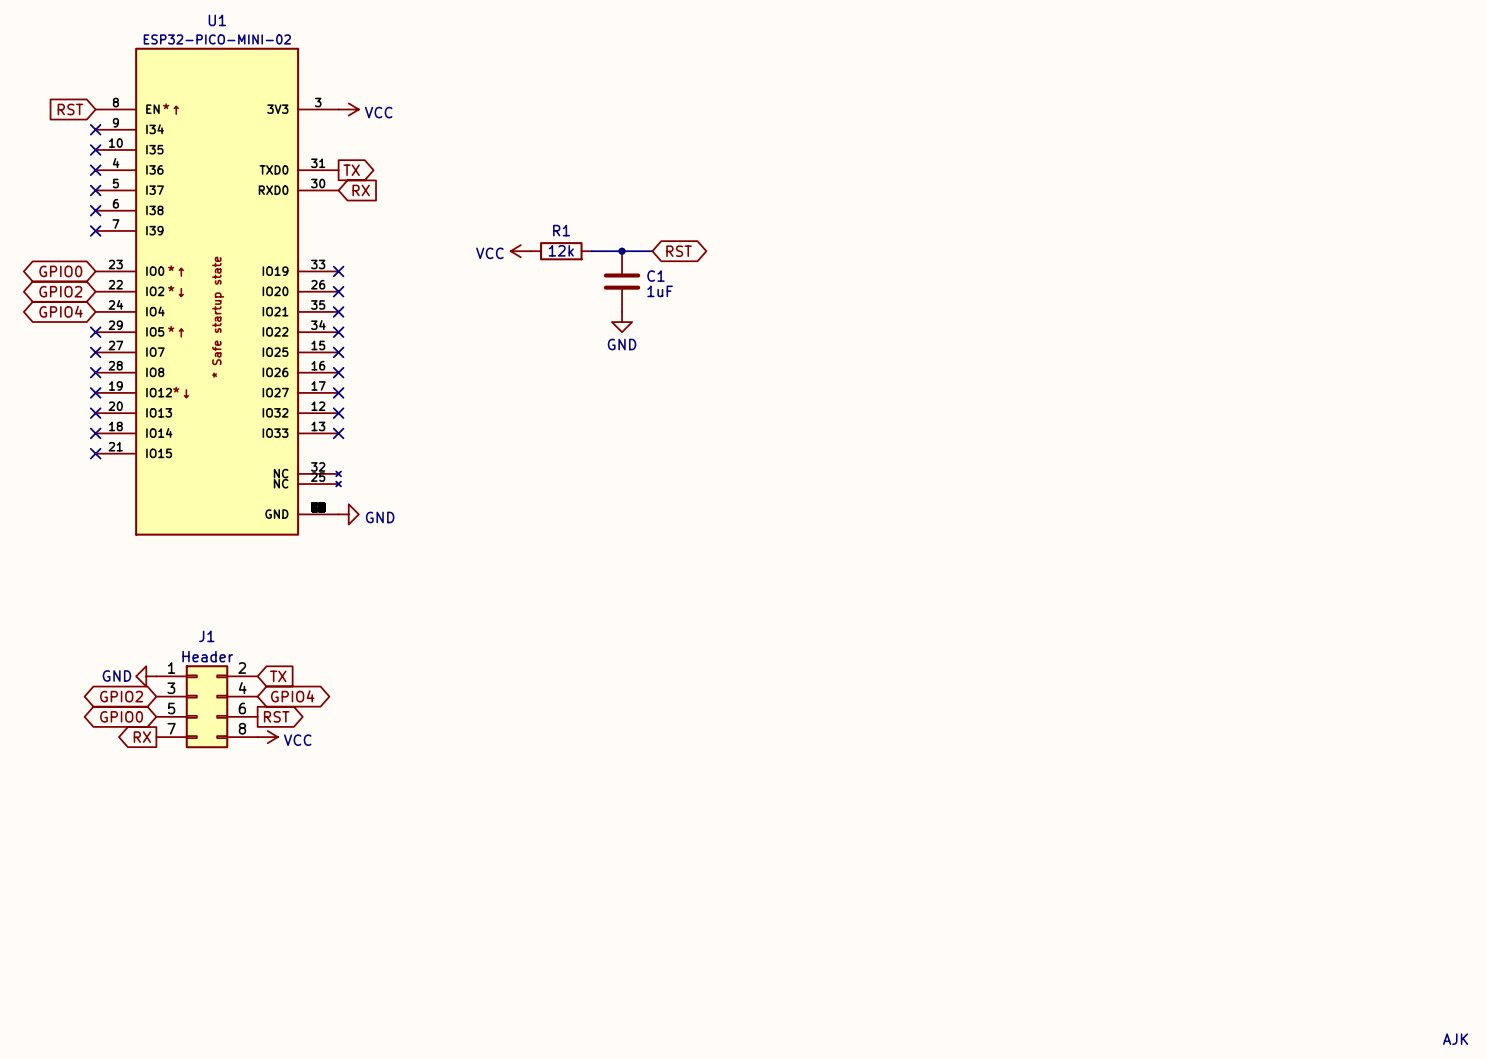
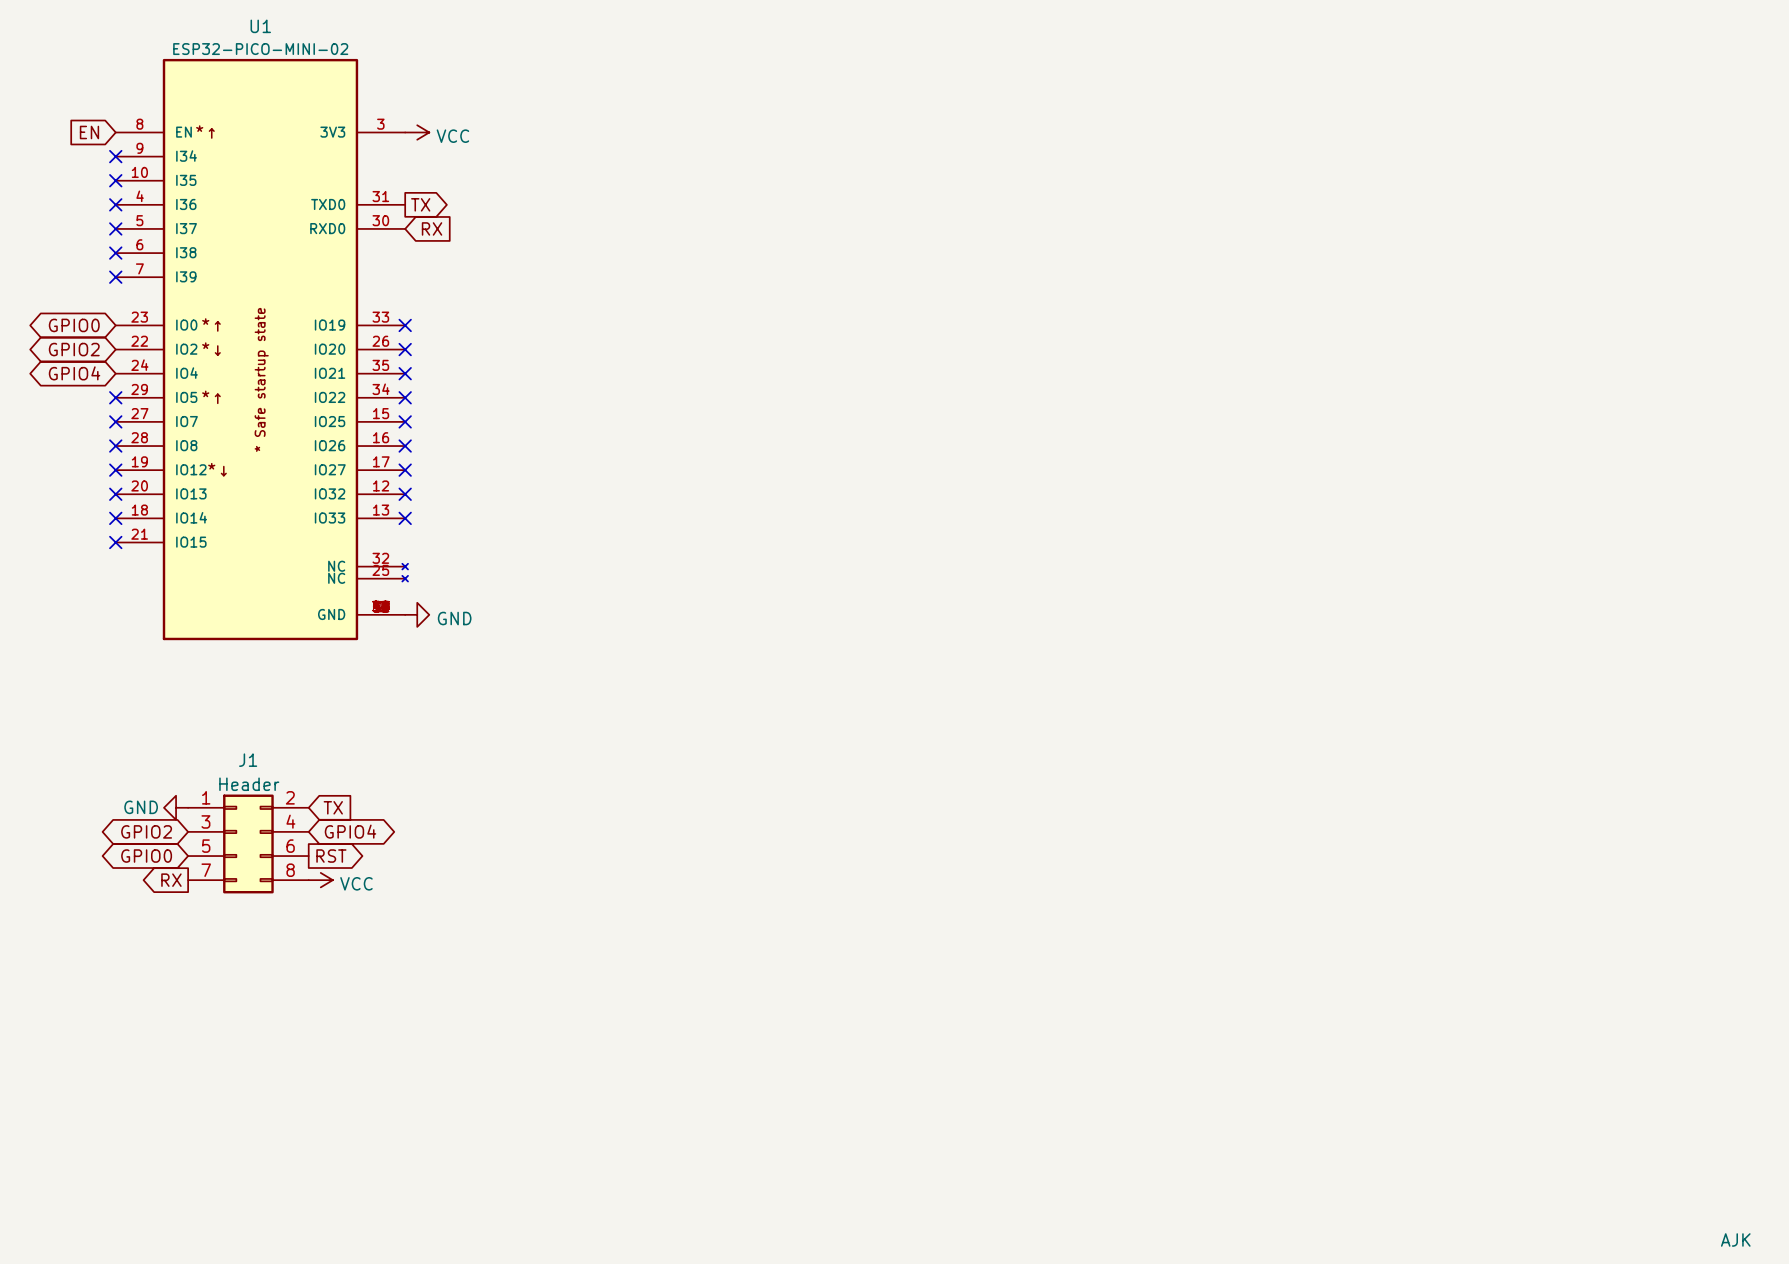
global label: RST (70, 109) -> EN (89, 132)
power symbol: VCC (520, 251) -> none
R1: 12k (561, 251) -> none
wire: (591, 251) (652, 251) -> none
junction: (622, 251) -> none
global label: RST (679, 251) -> none
C1: 1uF (622, 281) -> none
power symbol: GND (622, 322) -> none

